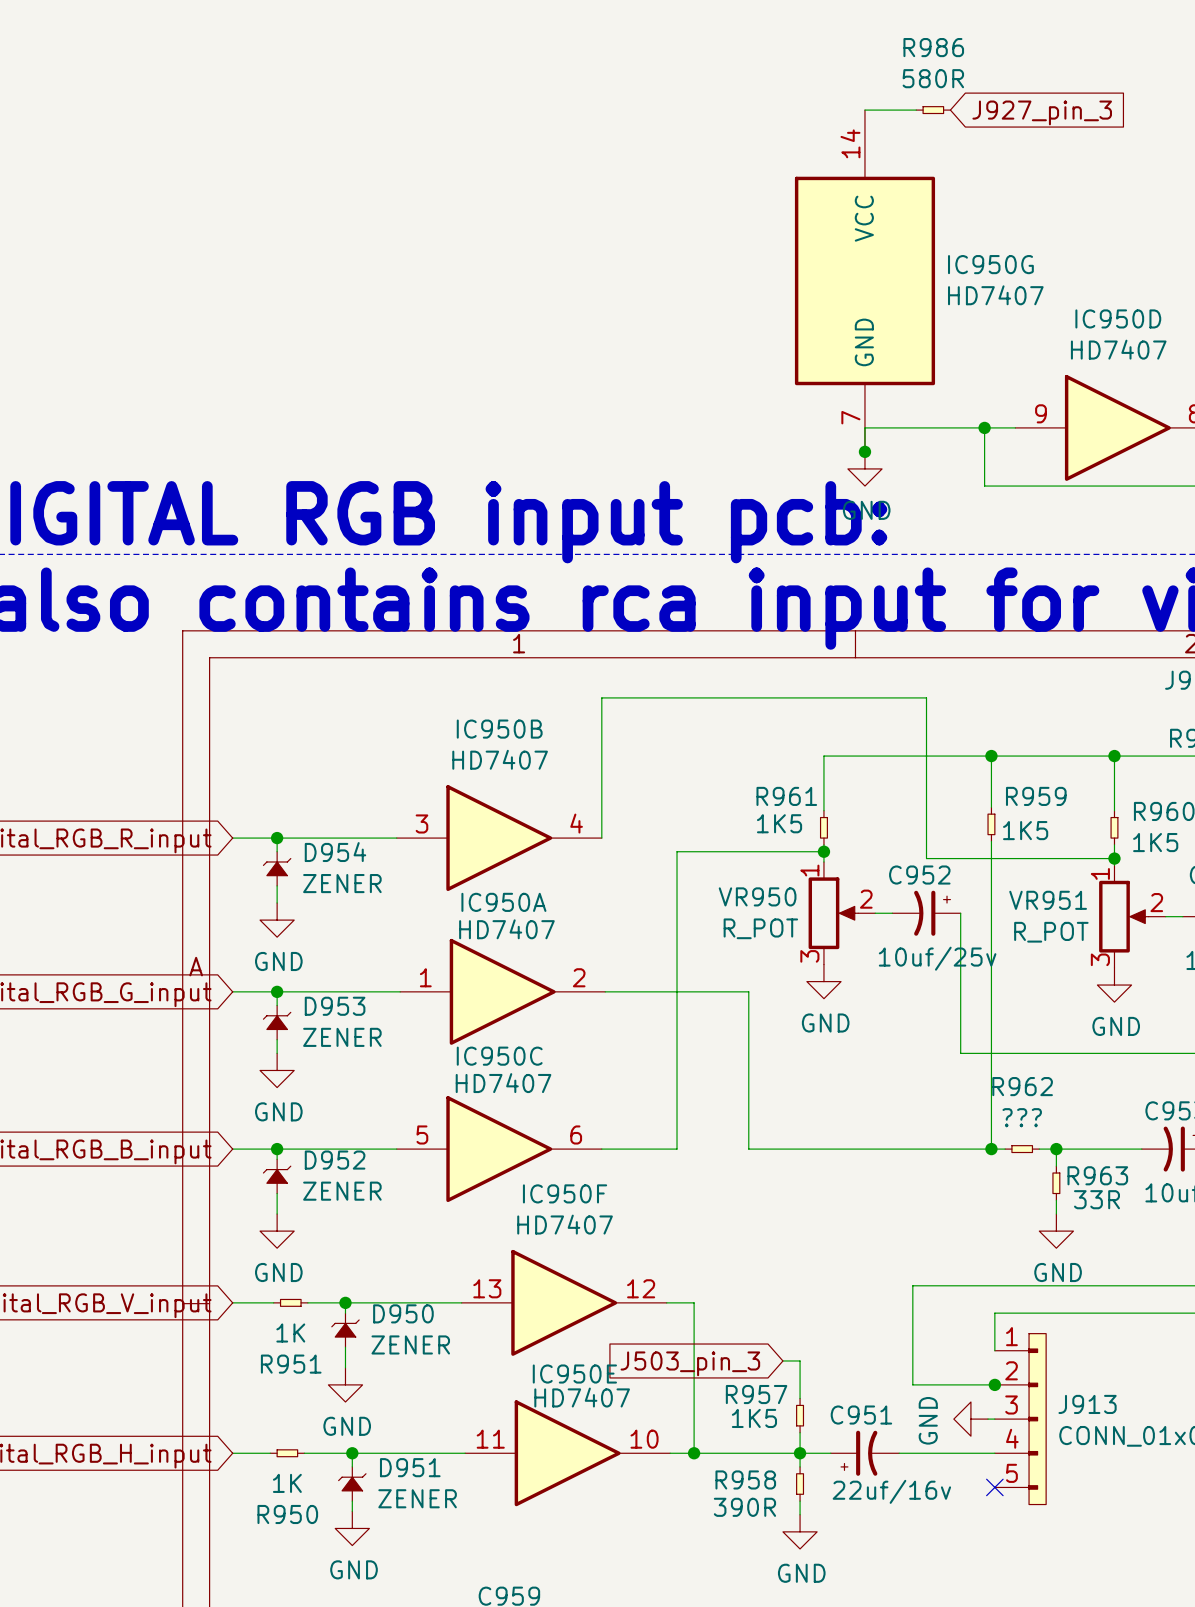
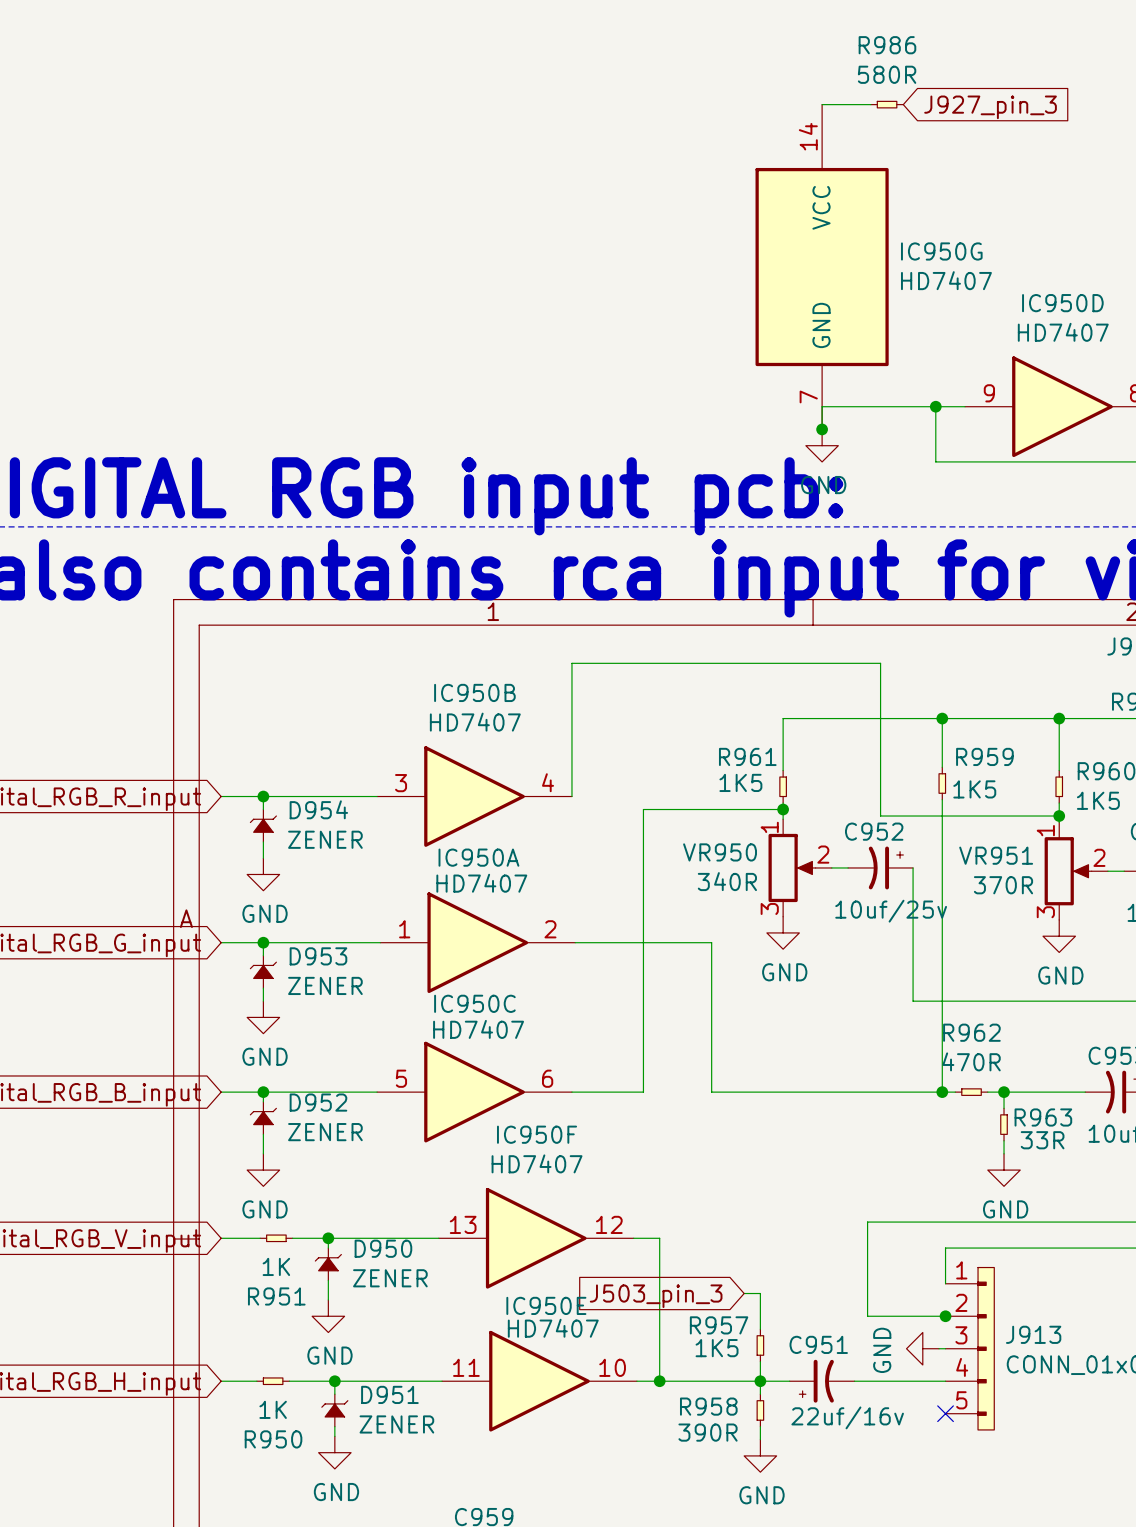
VR950 value: R_POT (760, 928) -> 340R (727, 881)
VR951 value: R_POT (1051, 932) -> 370R (1003, 885)
R962 value: ??? (1022, 1117) -> 470R (971, 1061)

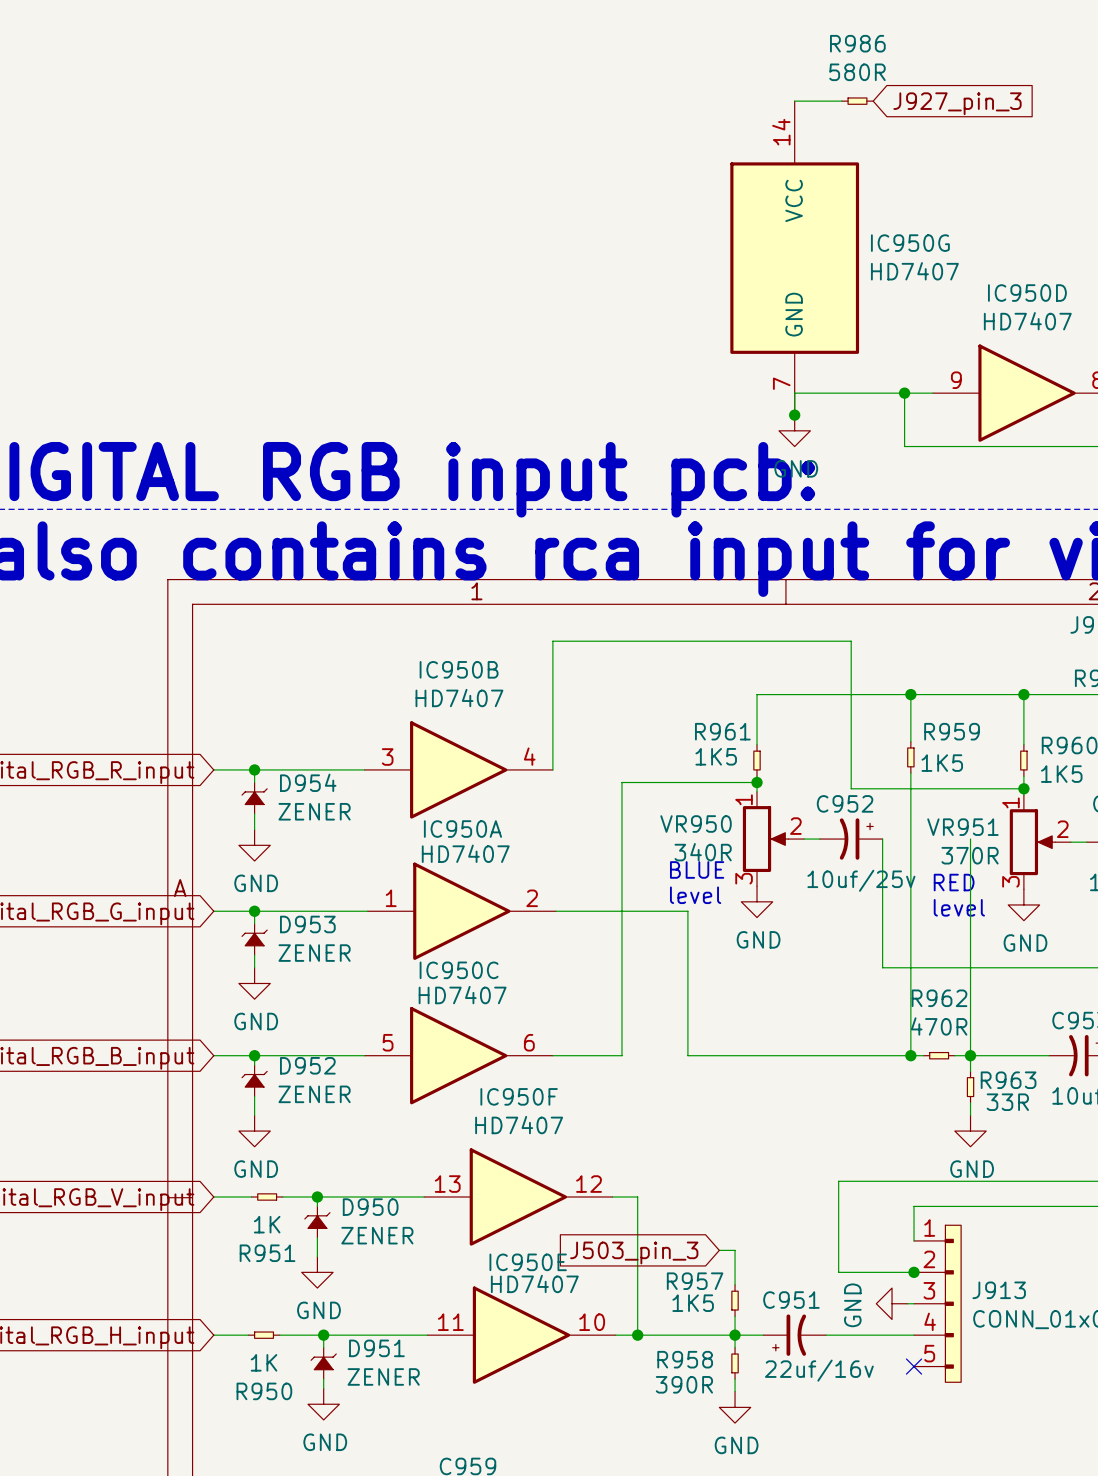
wire: none -> (970, 839) (970, 1055)
text: none -> BLUE (697, 869)
text: none -> RED (954, 882)
text: none -> level (695, 895)
text: none -> level (959, 907)

